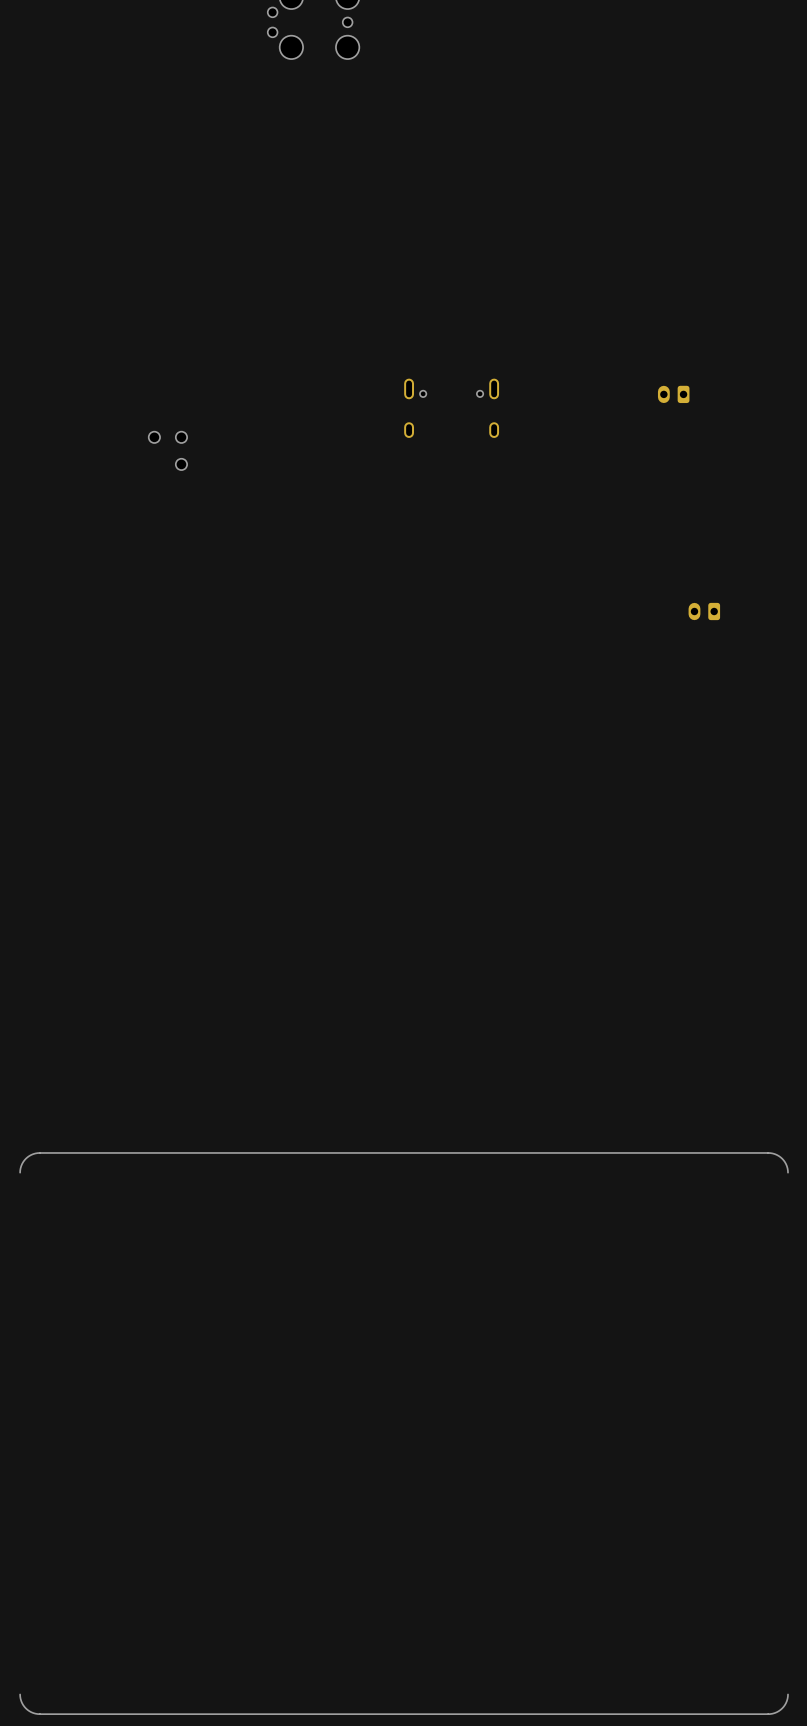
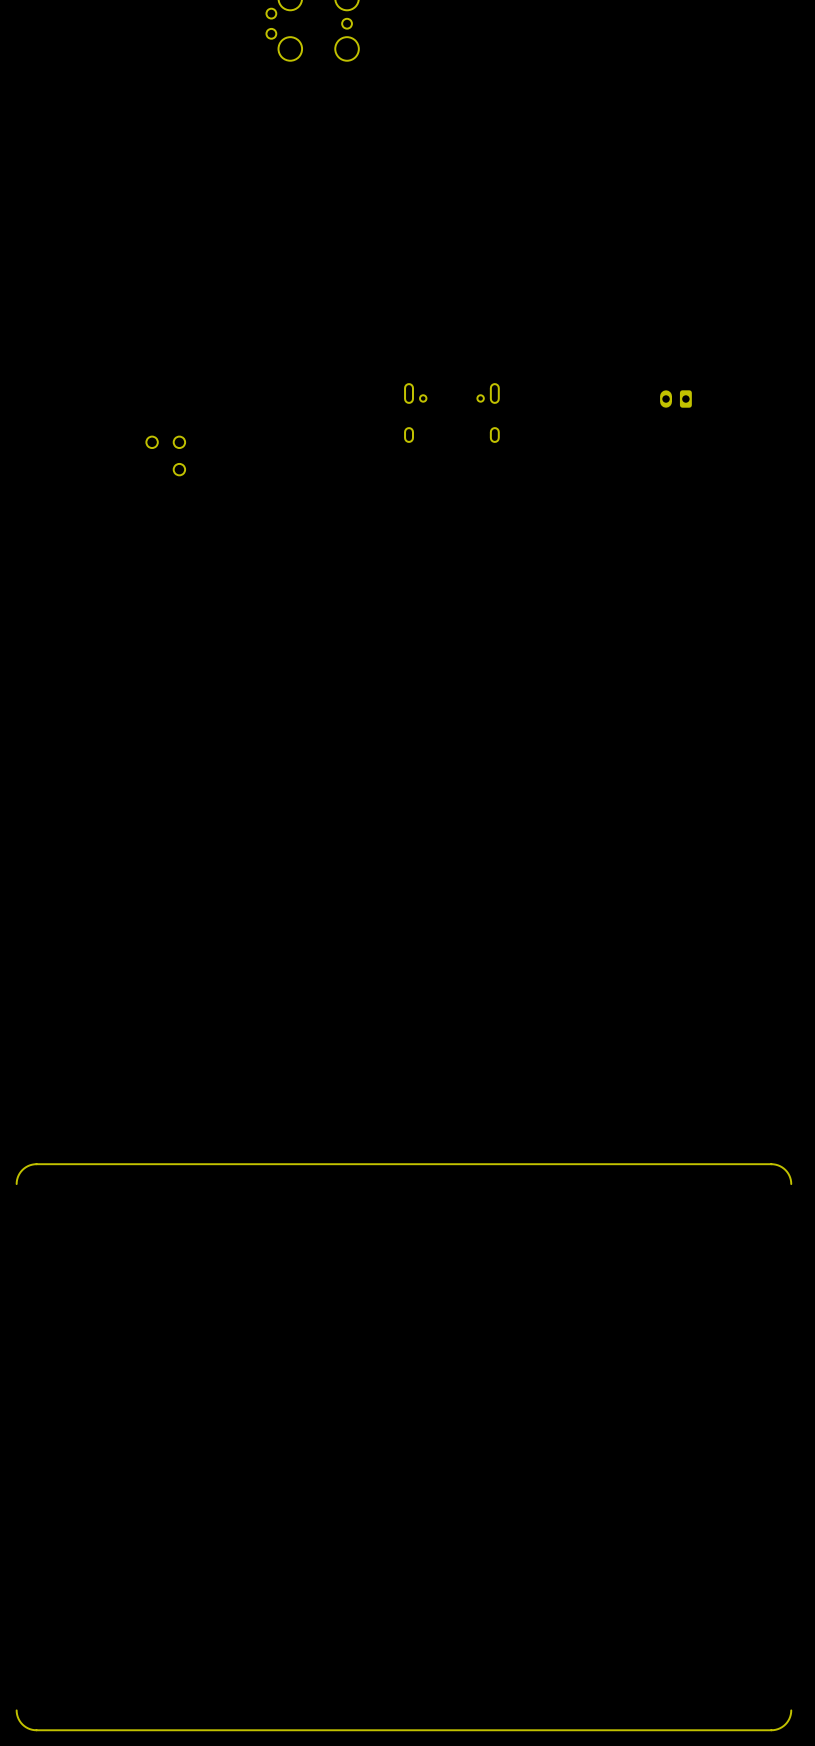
part: (704, 611) -> none

